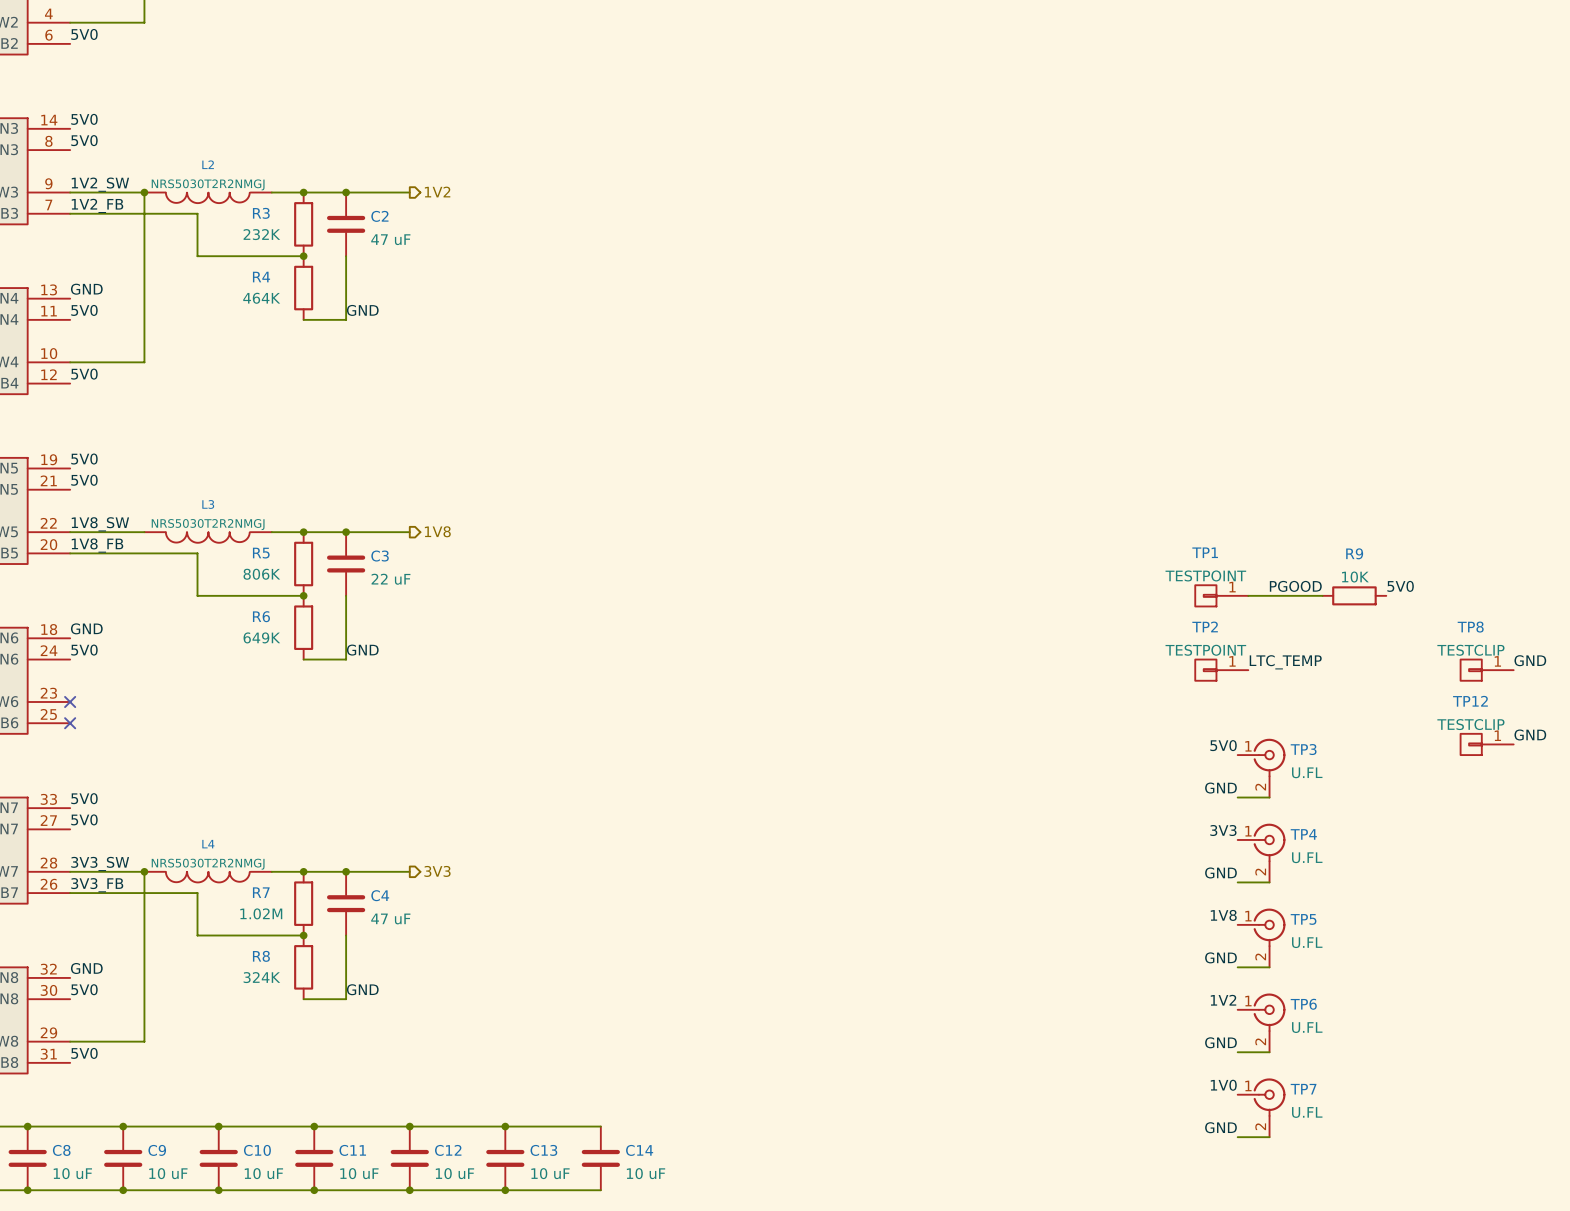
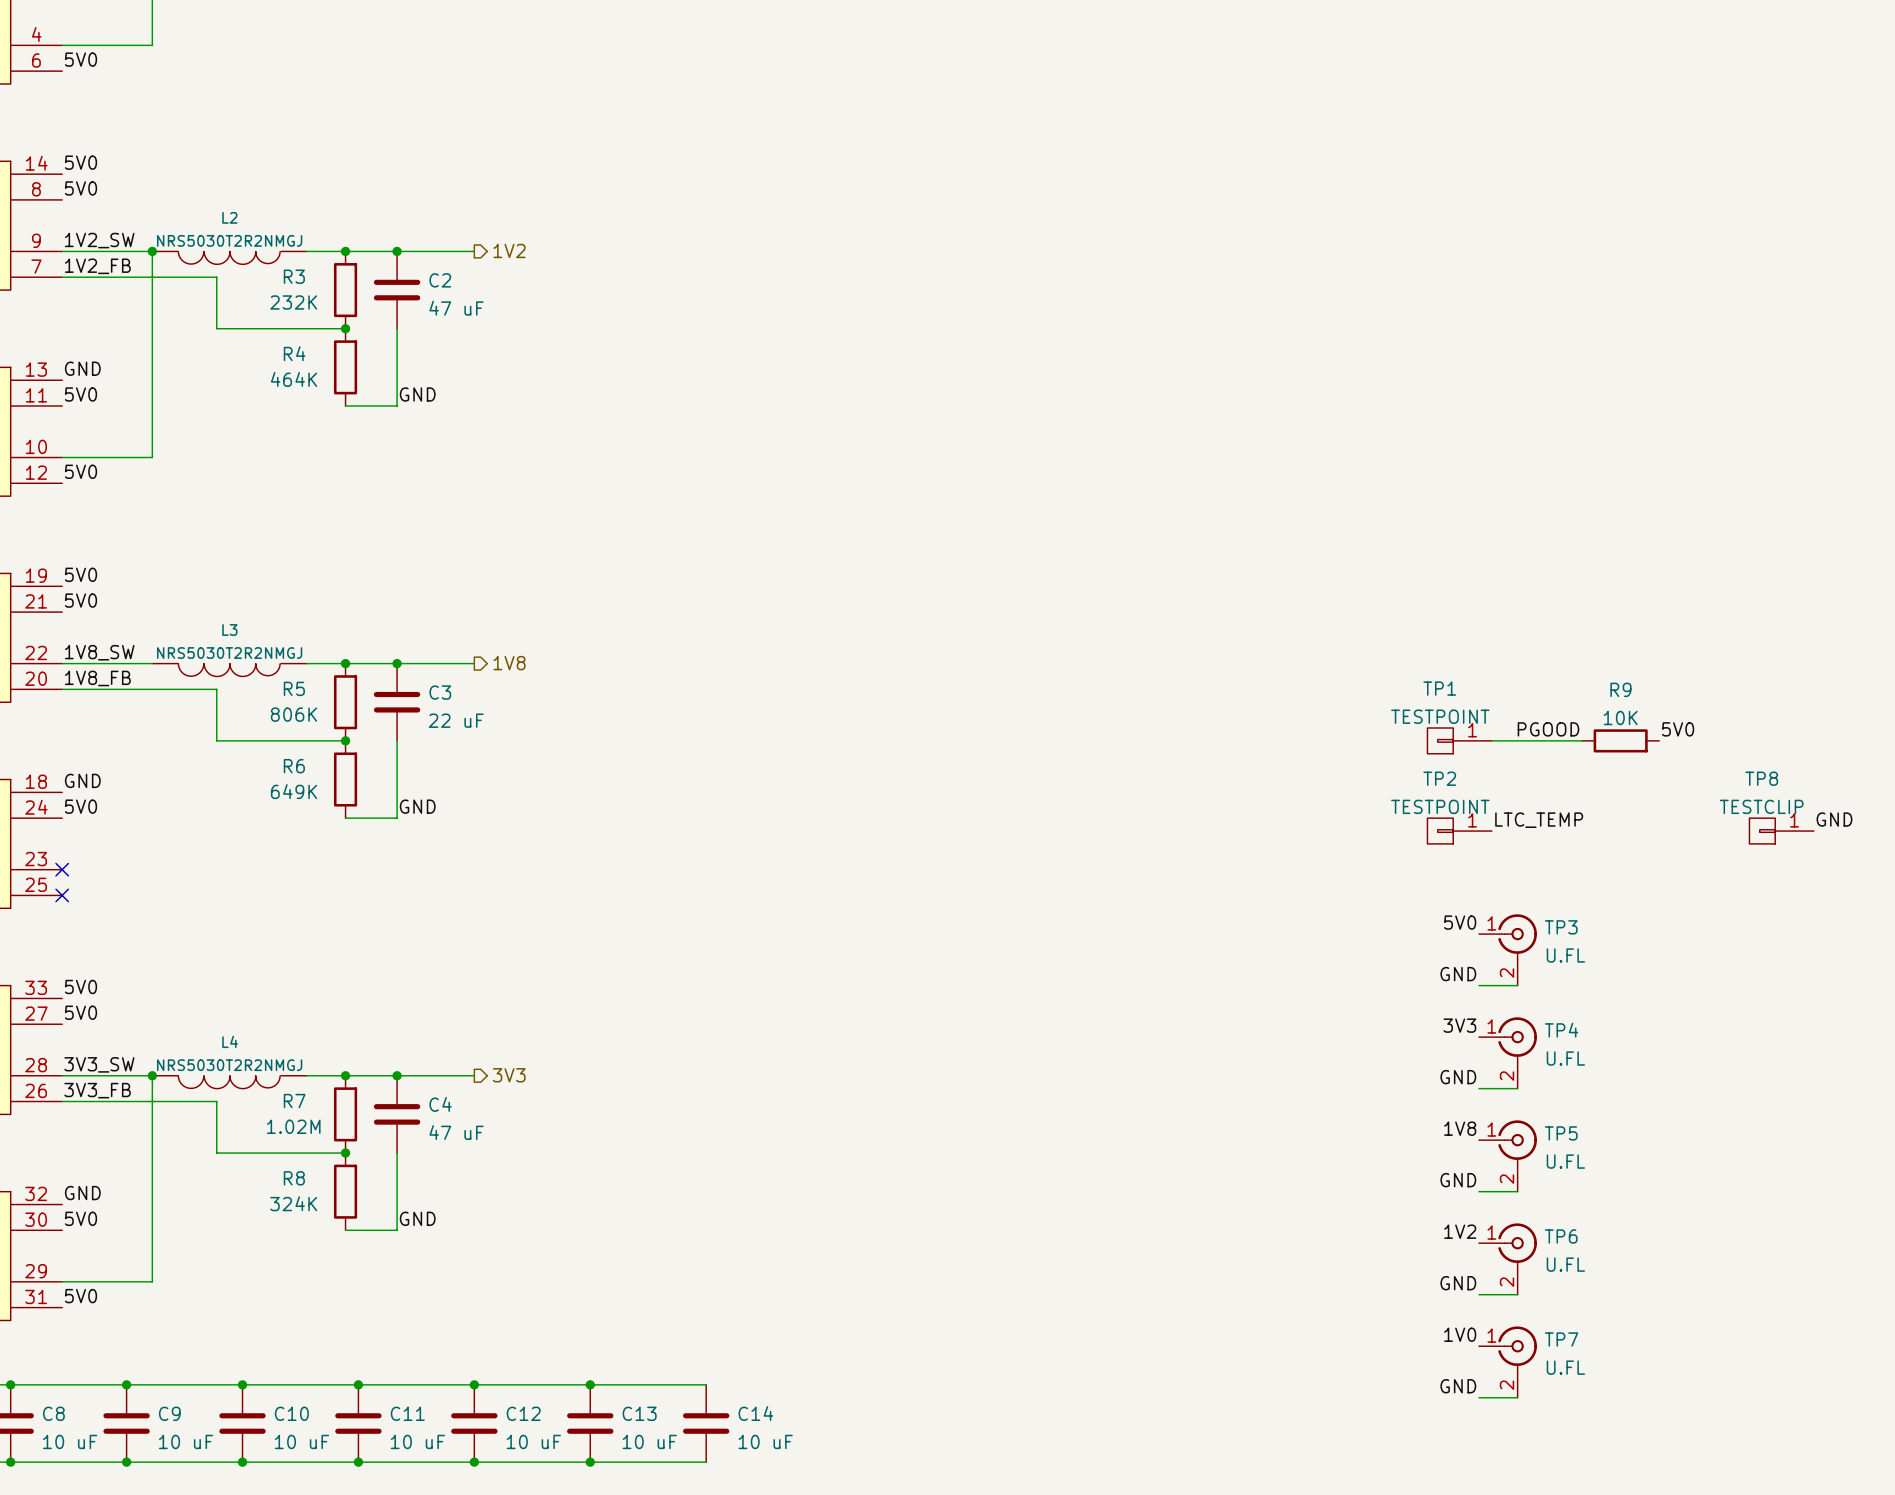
label: GND (1530, 734) -> none
TP12: TESTCLIP (1487, 744) -> none

